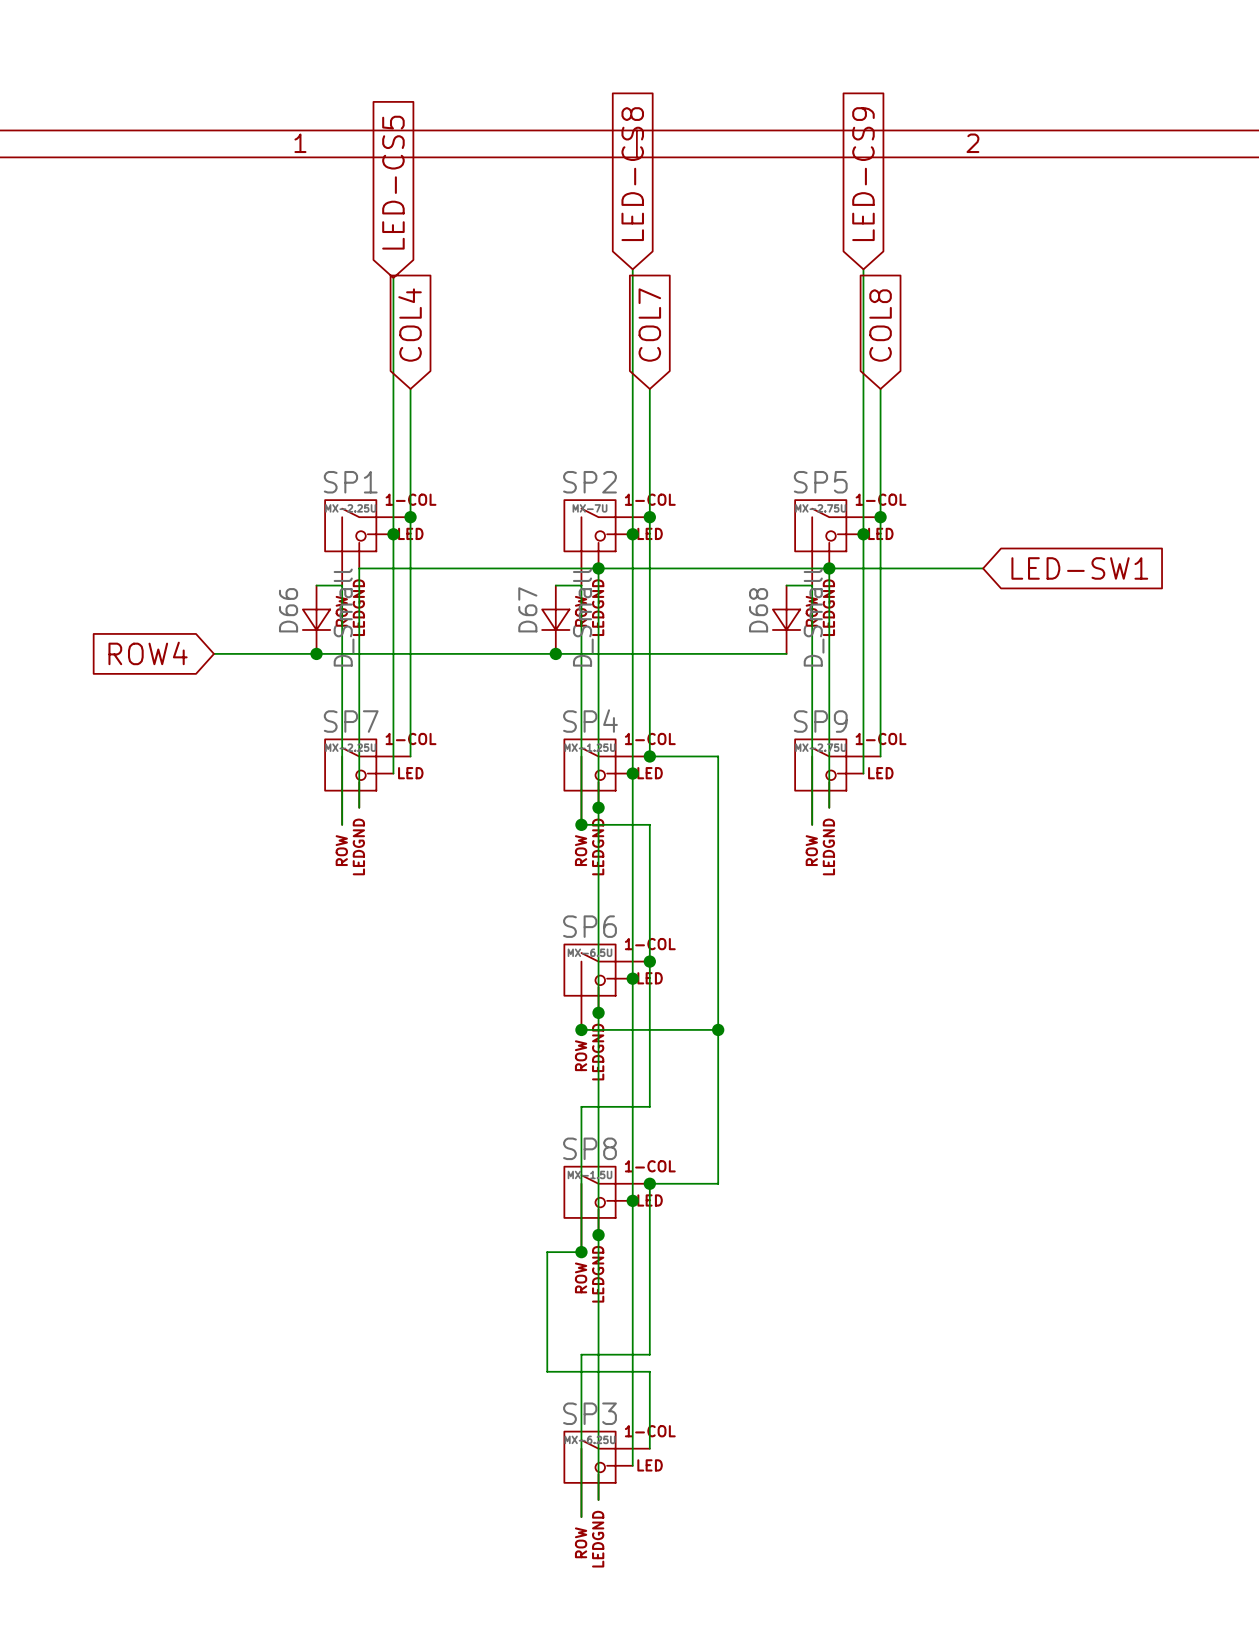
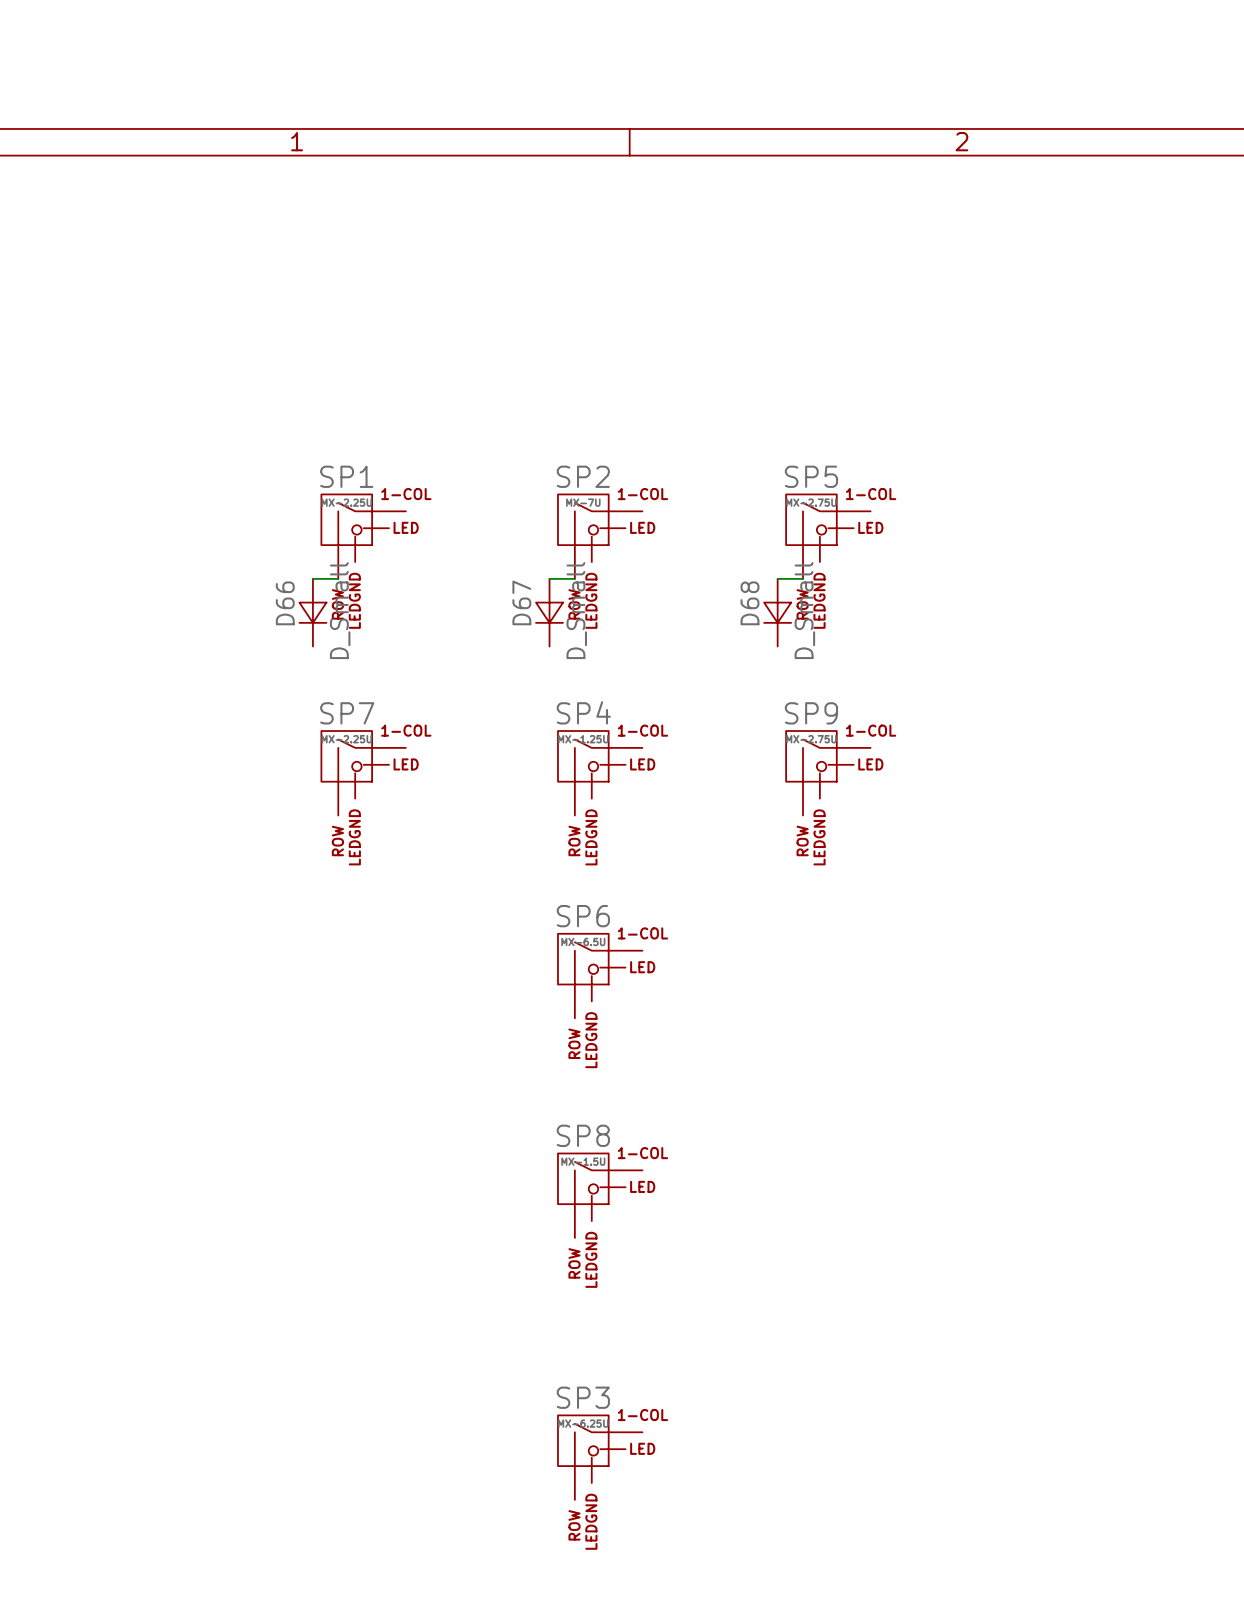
global label: LED-CS8 (632, 174) -> none
global label: LED-CS9 (863, 174) -> none
global label: LED-CS5 (393, 182) -> none
wire: (632, 269) (632, 1465) -> none
wire: (863, 269) (863, 773) -> none
wire: (393, 277) (393, 773) -> none
global label: COL4 (410, 325) -> none
global label: COL7 (649, 325) -> none
global label: COL8 (880, 325) -> none
wire: (410, 389) (410, 756) -> none
wire: (649, 389) (649, 756) (718, 756) (718, 1183) (649, 1183) (649, 1354) (581, 1354) (581, 1517) -> none
wire: (880, 389) (880, 756) -> none
junction: (410, 517) -> none
junction: (649, 517) -> none
junction: (880, 517) -> none
junction: (393, 534) -> none
junction: (632, 534) -> none
junction: (863, 534) -> none
wire: (598, 568) (598, 1499) -> none
junction: (598, 568) -> none
wire: (829, 568) (829, 807) -> none
junction: (829, 568) -> none
wire: (983, 568) (359, 568) (359, 807) -> none
global label: LED-SW1 (1079, 568) -> none
wire: (342, 585) (342, 824) -> none
wire: (581, 585) (581, 824) (649, 824) (649, 1106) (581, 1106) (581, 1252) (547, 1252) (547, 1371) (649, 1371) (649, 1448) -> none
wire: (812, 585) (812, 824) -> none
global label: ROW4 (148, 653) -> none
wire: (213, 653) (786, 653) -> none
junction: (316, 653) -> none
junction: (555, 653) -> none
junction: (649, 756) -> none
junction: (632, 773) -> none
junction: (598, 807) -> none
junction: (581, 824) -> none
junction: (649, 961) -> none
junction: (632, 978) -> none
junction: (598, 1012) -> none
wire: (581, 1029) (718, 1029) -> none
junction: (581, 1029) -> none
junction: (718, 1029) -> none
junction: (649, 1183) -> none
junction: (632, 1200) -> none
junction: (598, 1235) -> none
junction: (581, 1252) -> none

